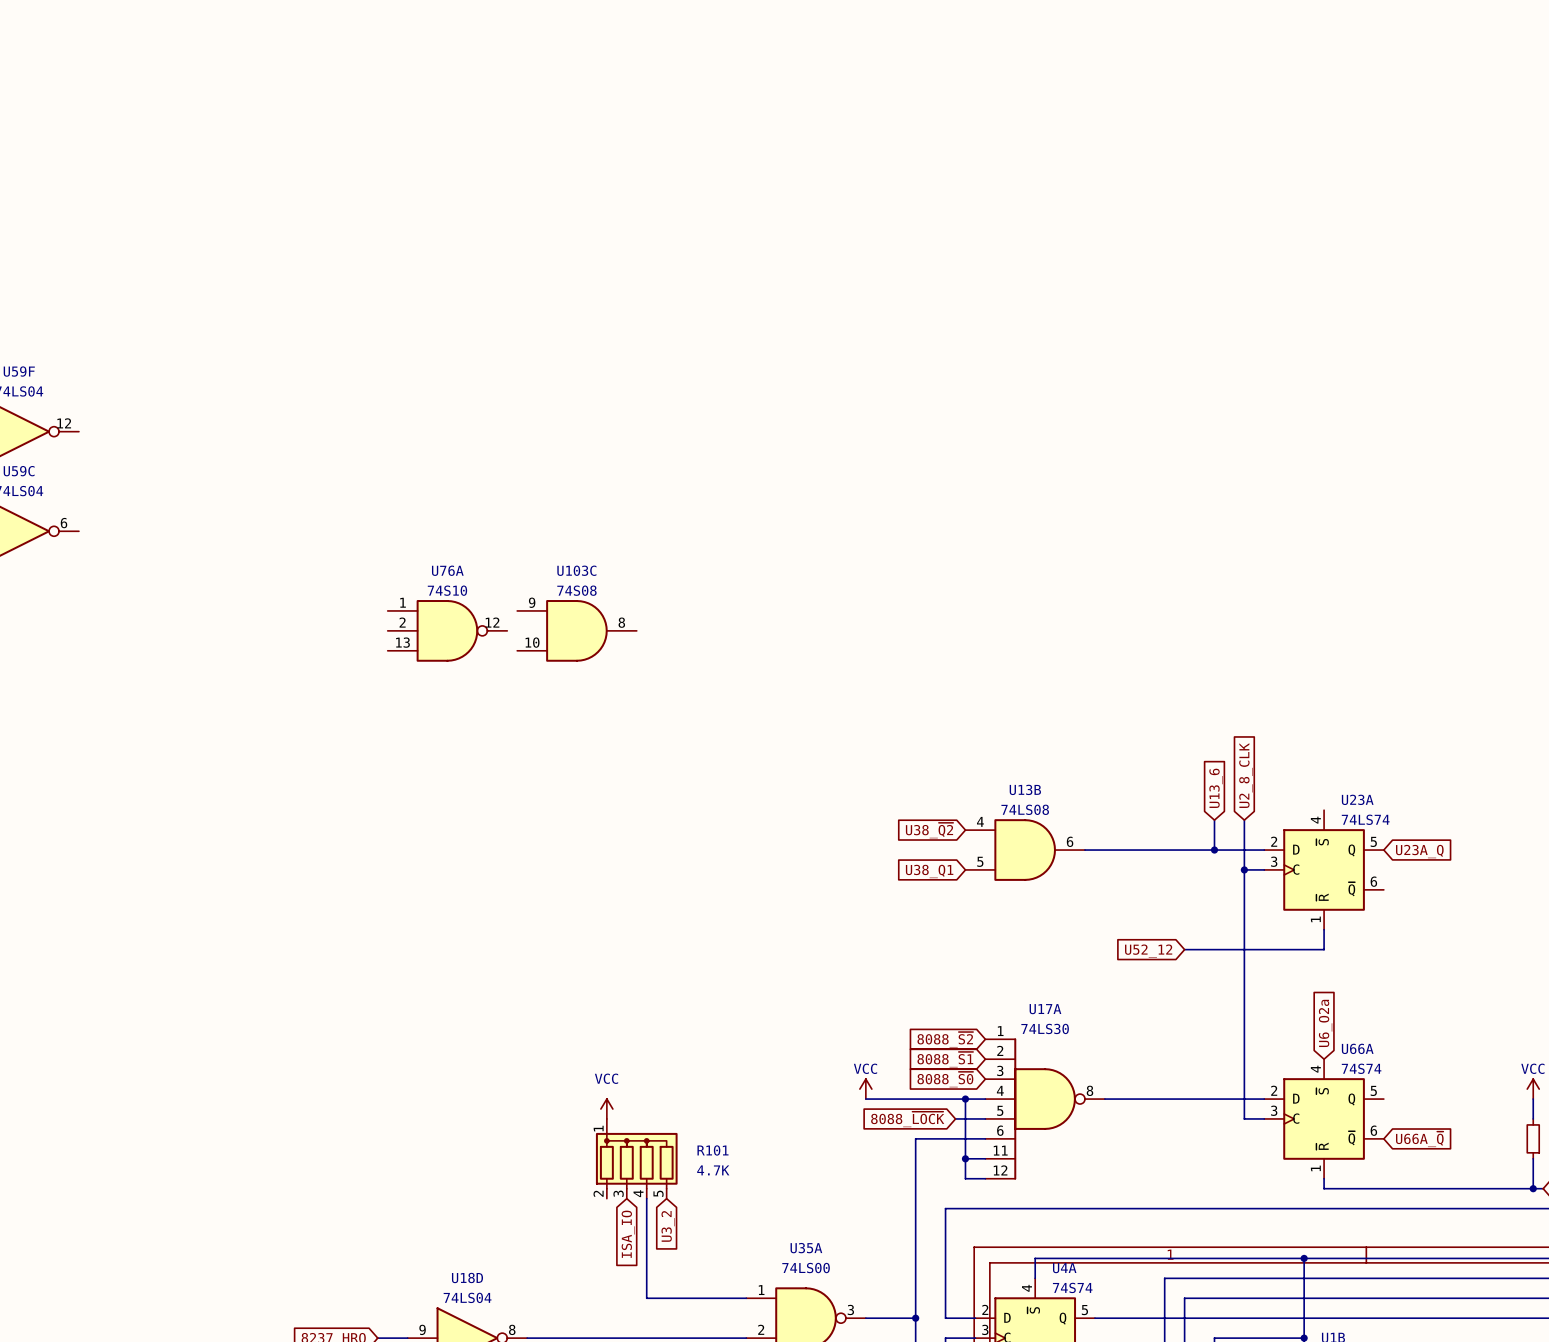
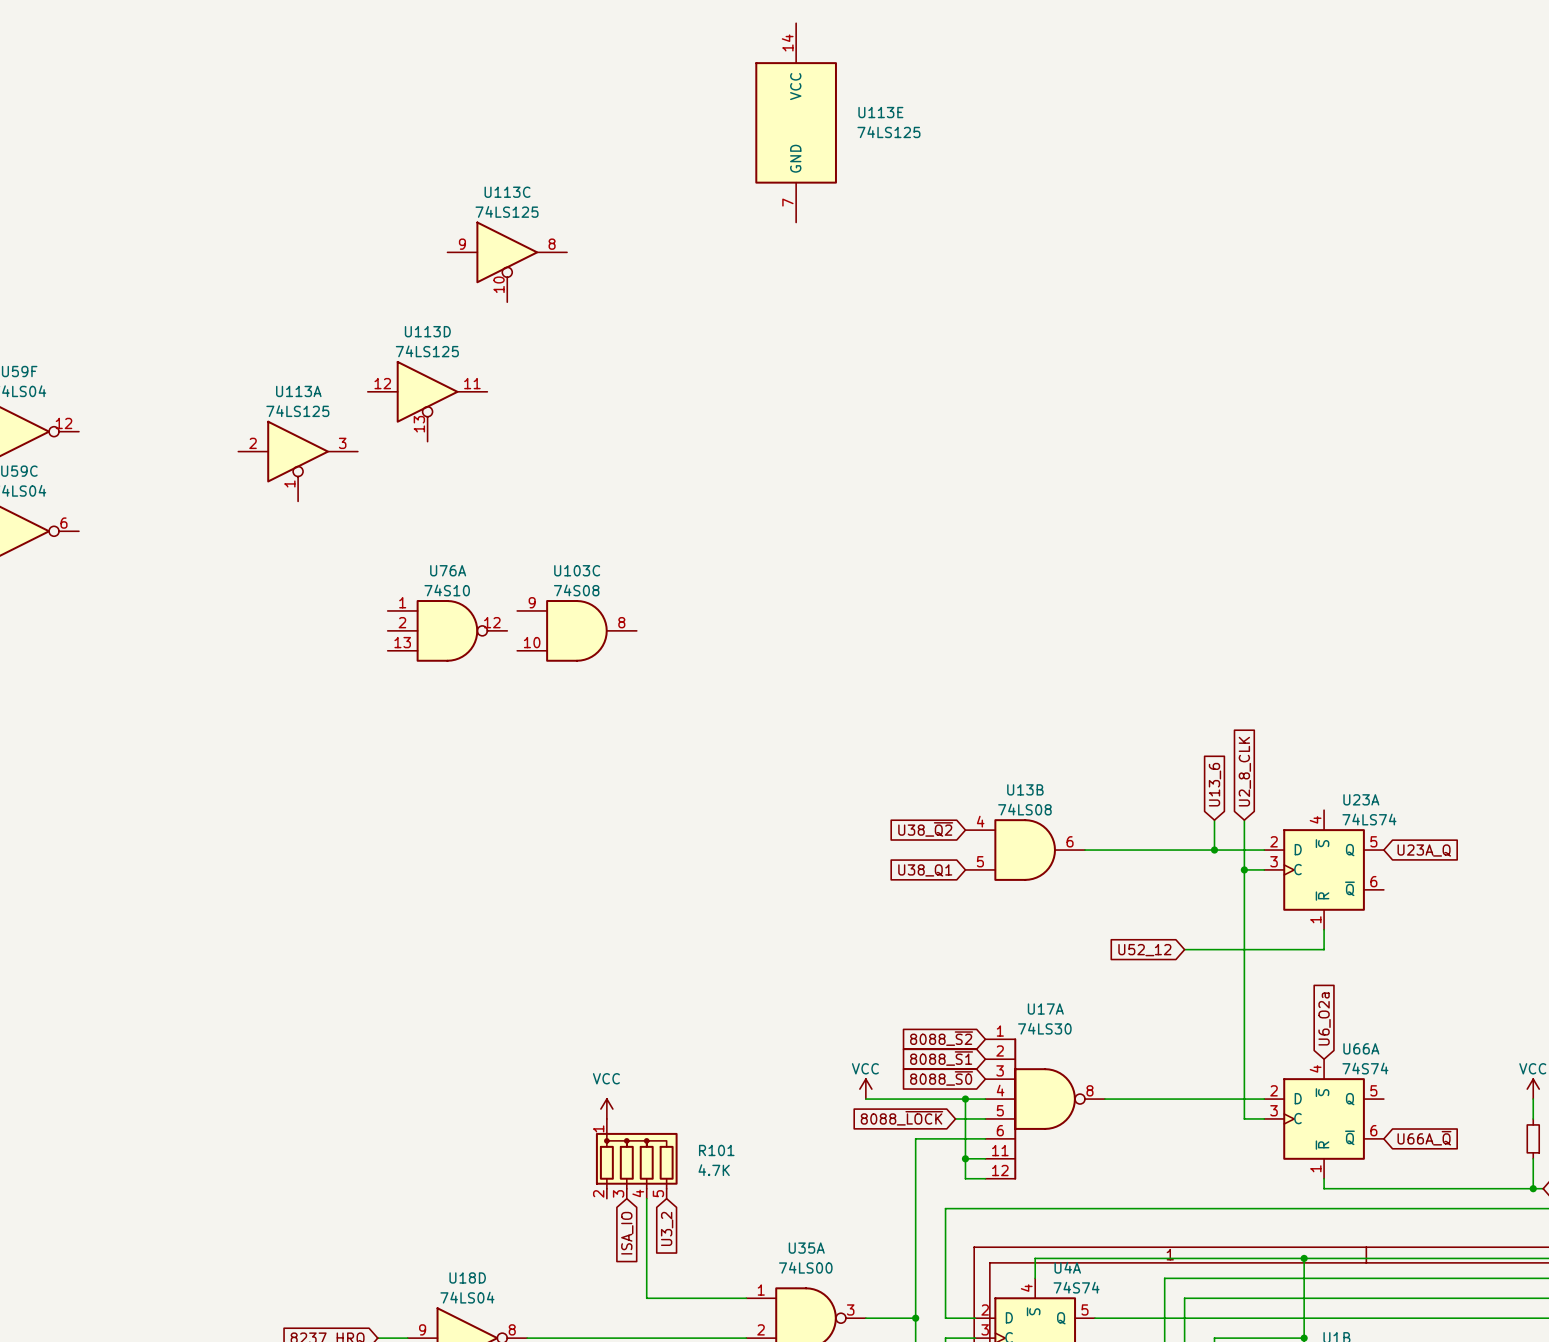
U113E: none -> 74LS125 (796, 122)
U113C: none -> 74LS125 (507, 261)
U113D: none -> 74LS125 (427, 401)
U113A: none -> 74LS125 (298, 461)

